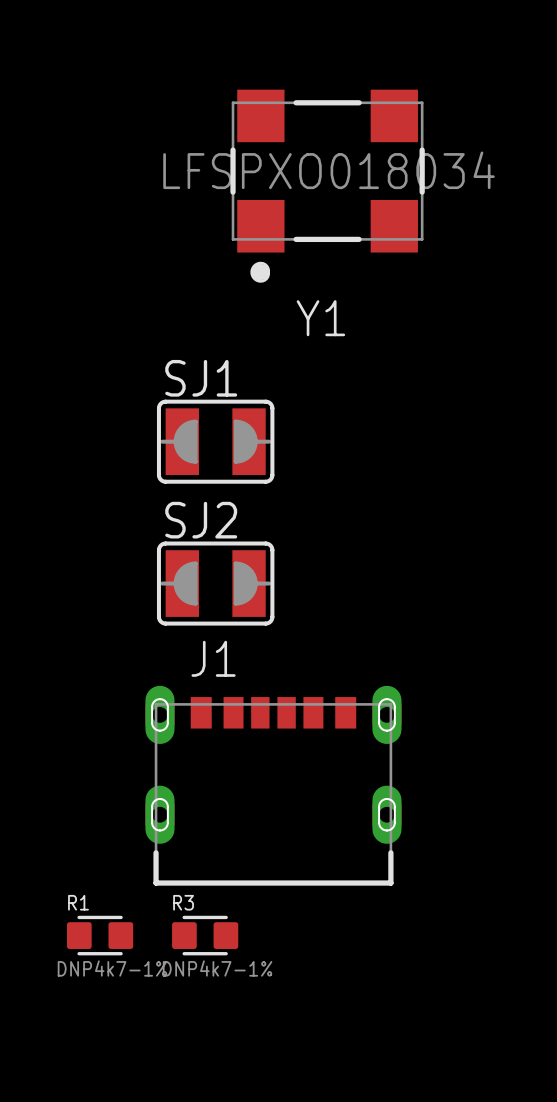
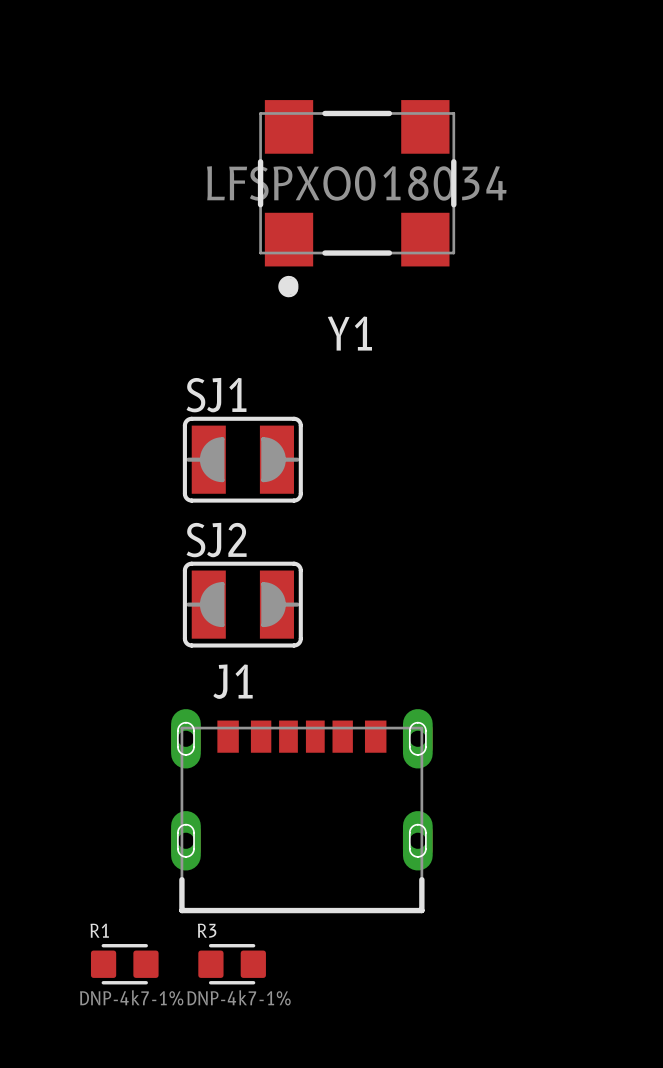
R1 value: DNP4k7-1% (112, 968) -> DNP-4k7-1% (131, 997)
R3 value: DNP4k7-1% (217, 968) -> DNP-4k7-1% (239, 997)

